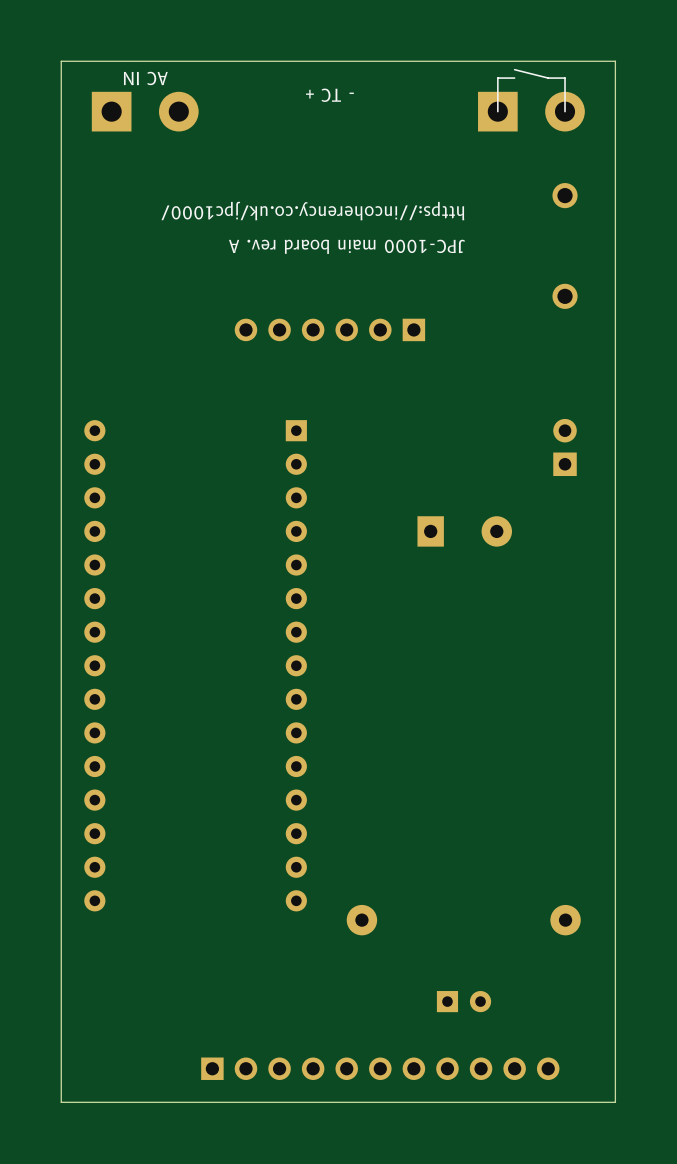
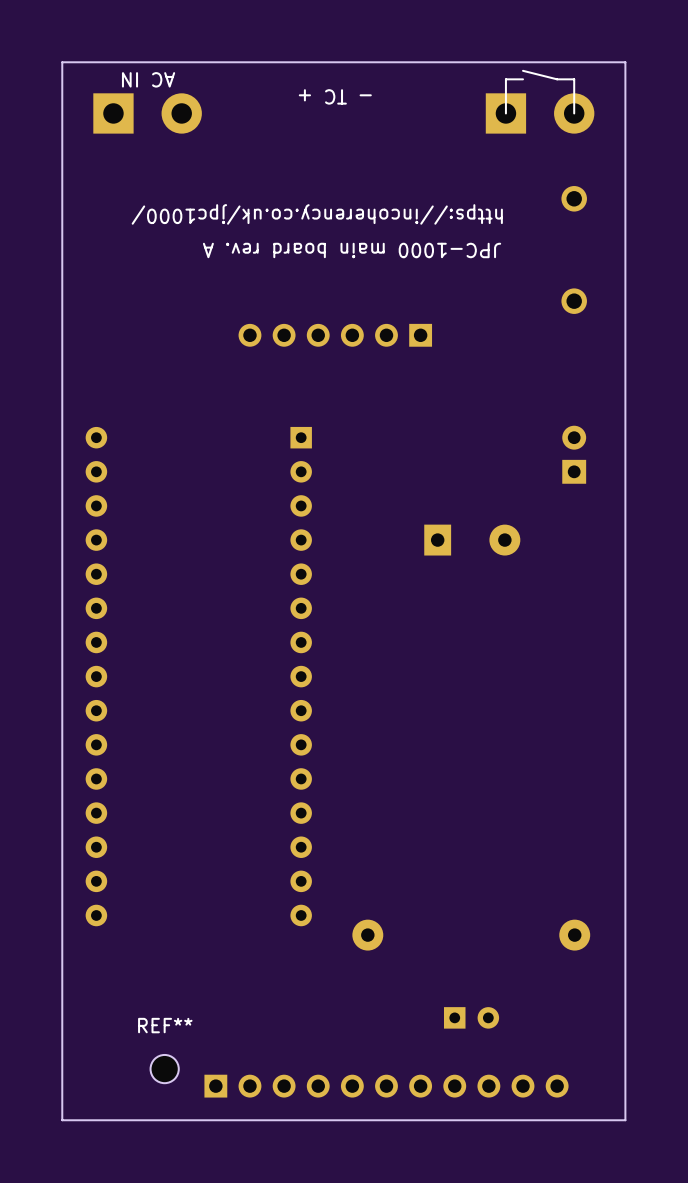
REF**: none -> (164, 1069)

